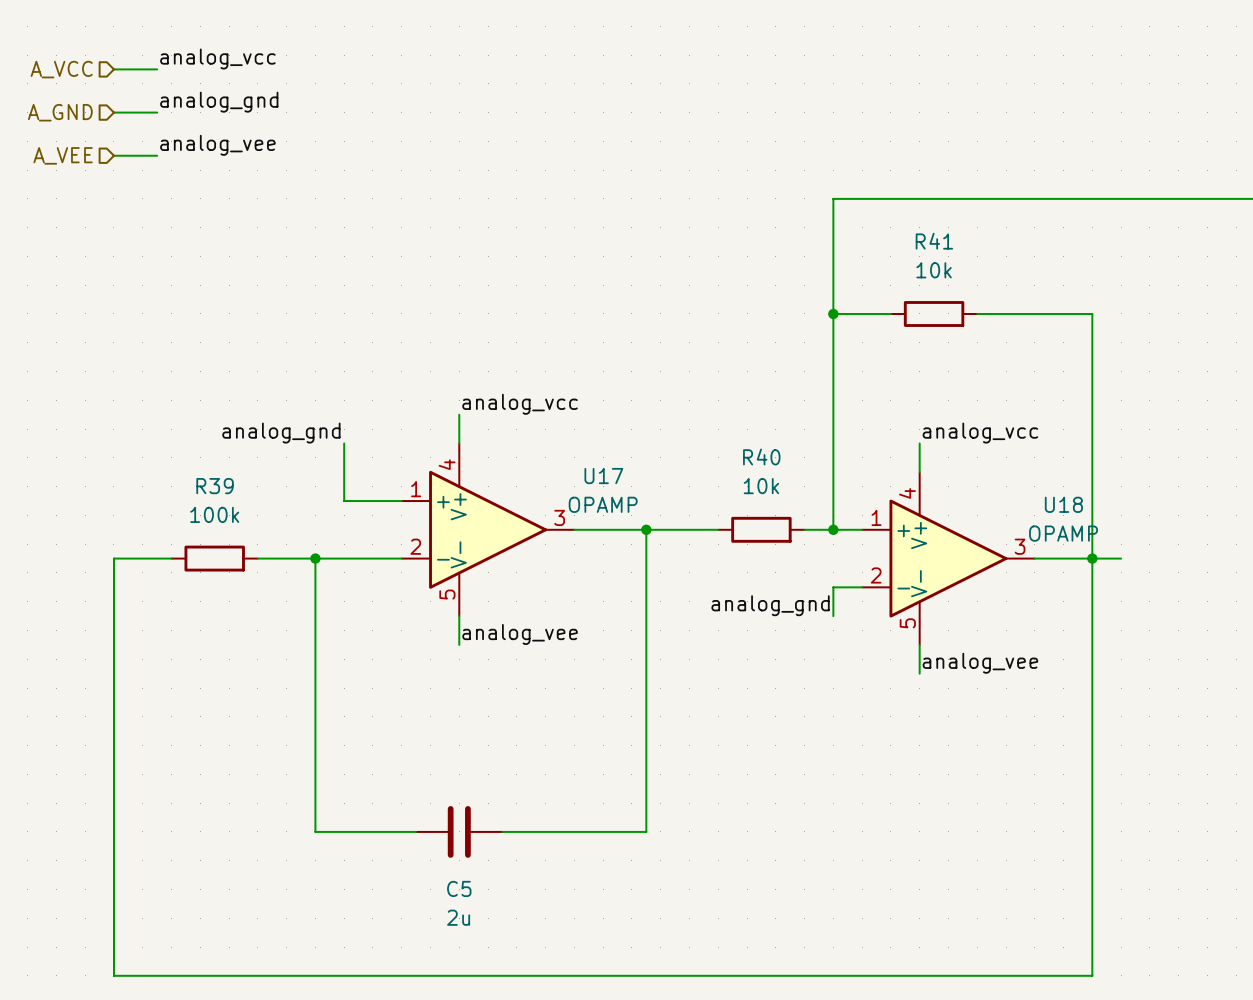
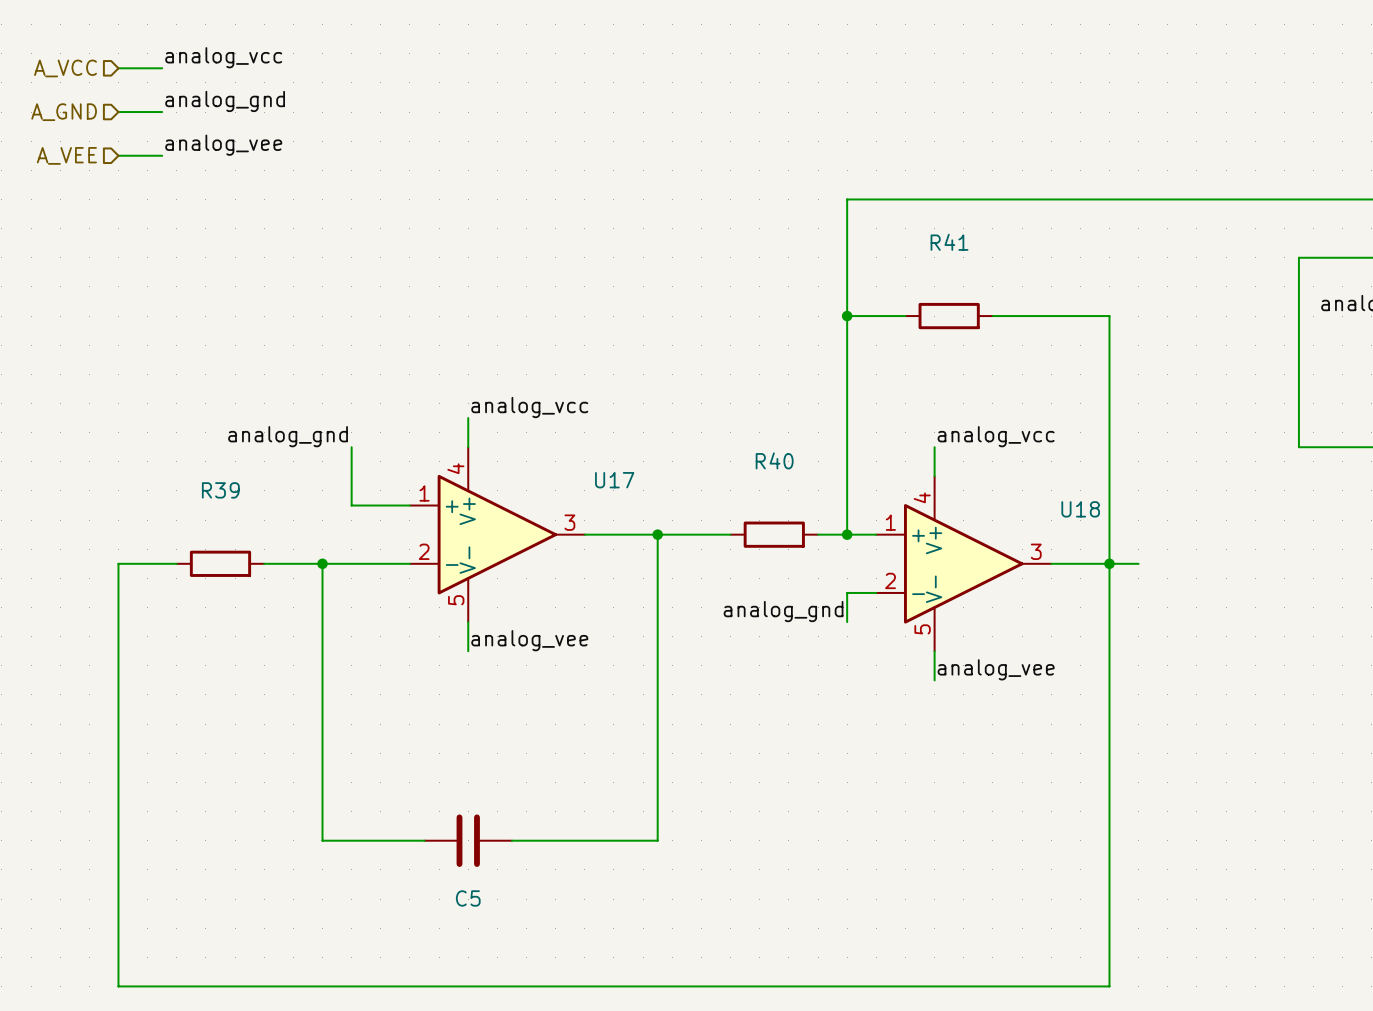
R41 value: 10k (934, 270) -> none
R40 value: 10k (761, 486) -> none
U17 value: OPAMP (603, 504) -> none
R39 value: 100k (214, 514) -> none
U18 value: OPAMP (1063, 533) -> none
C5 value: 2u (458, 917) -> none

